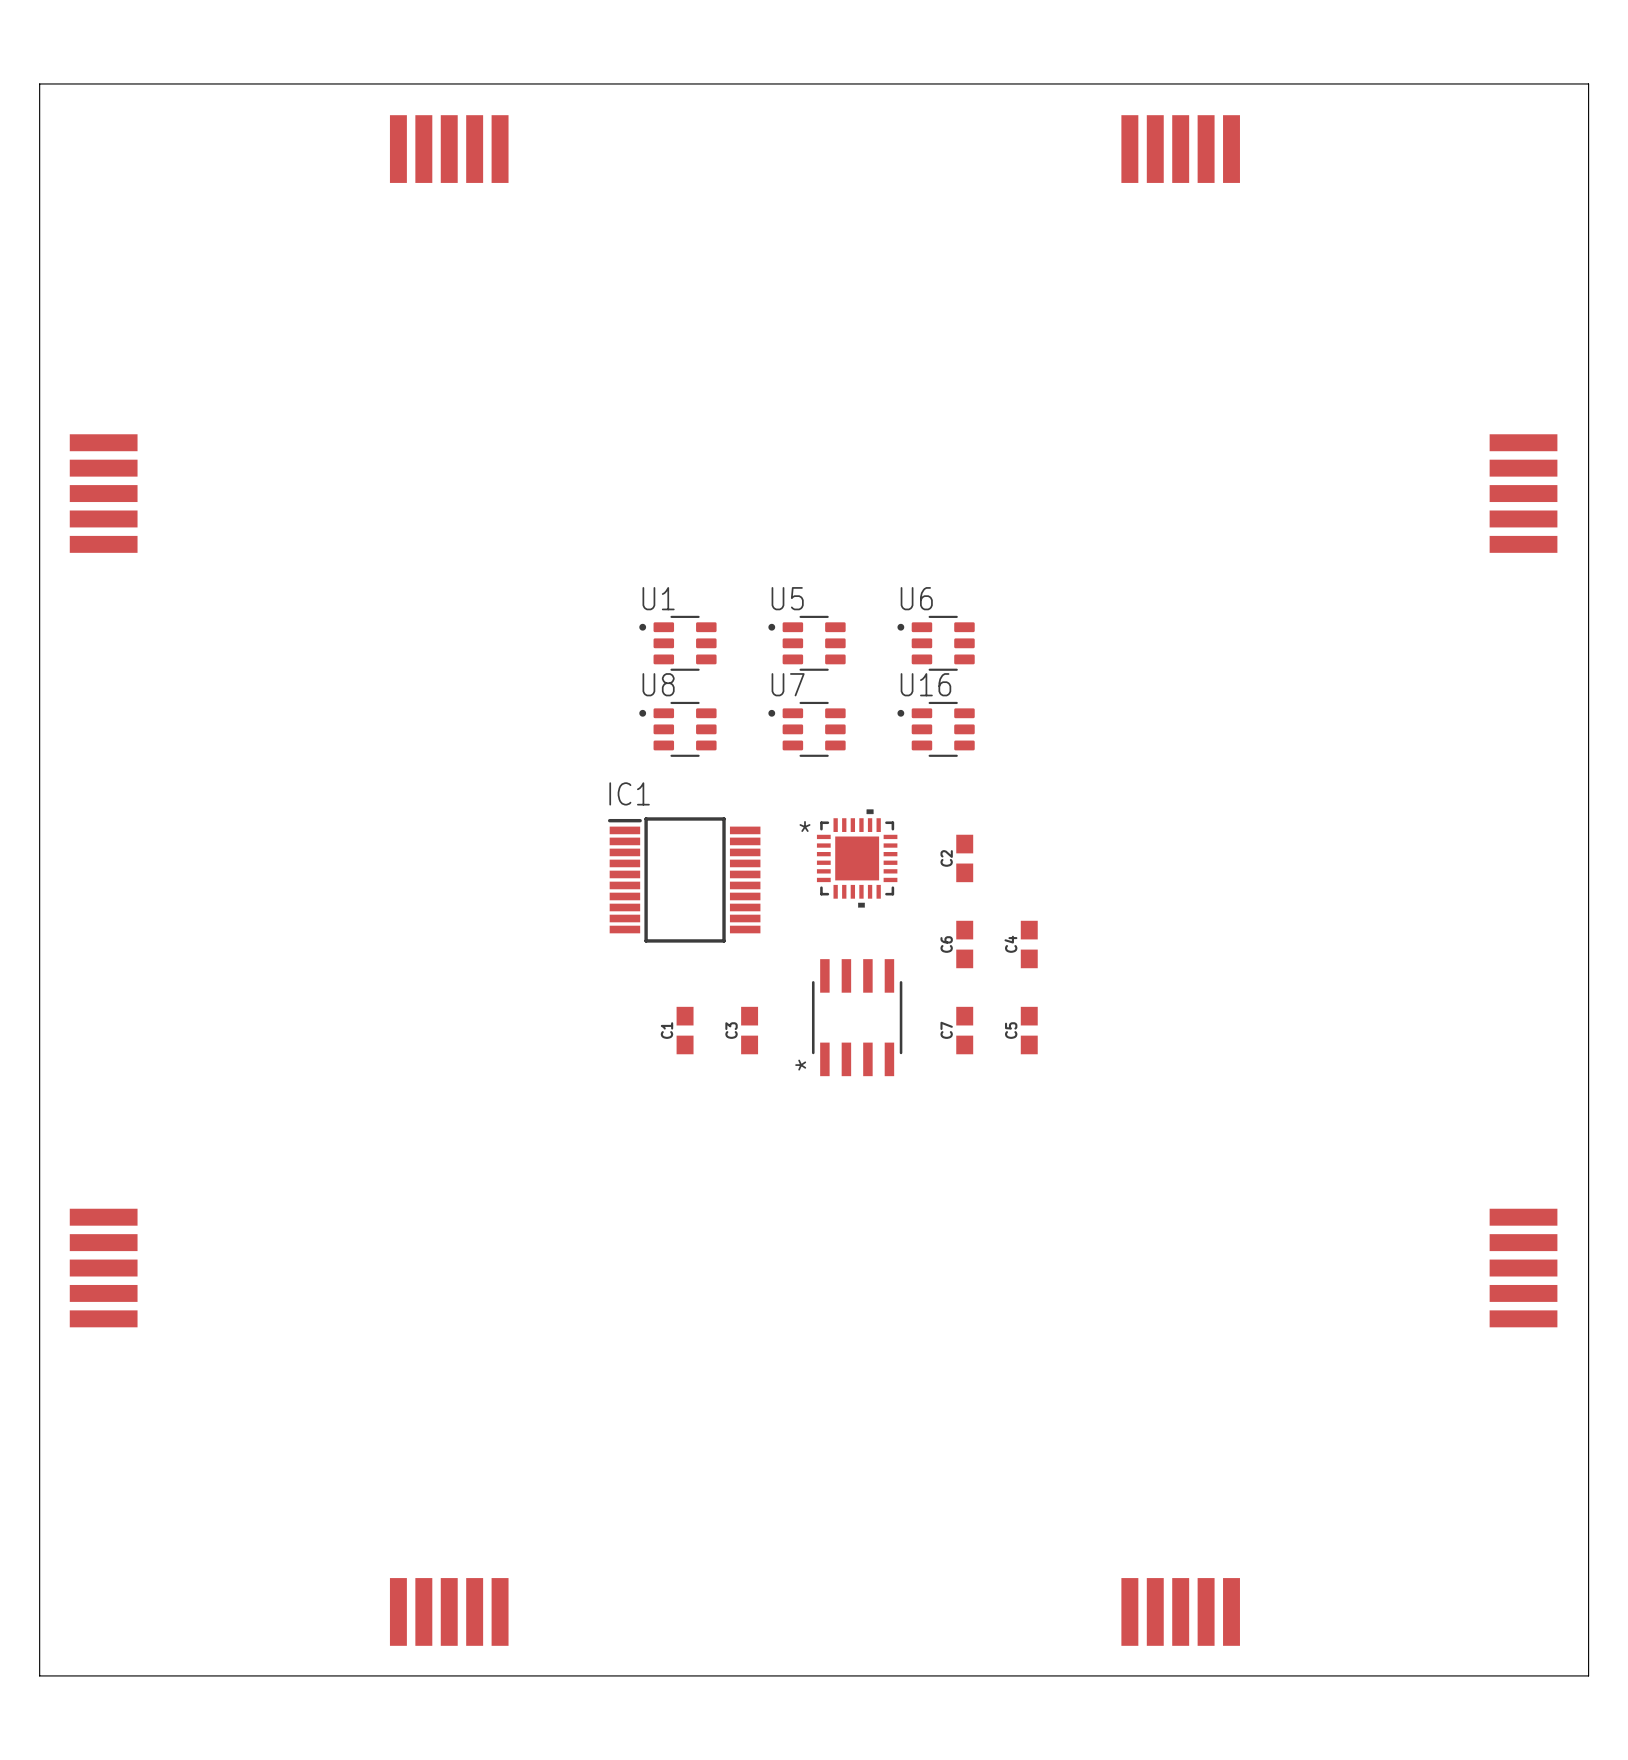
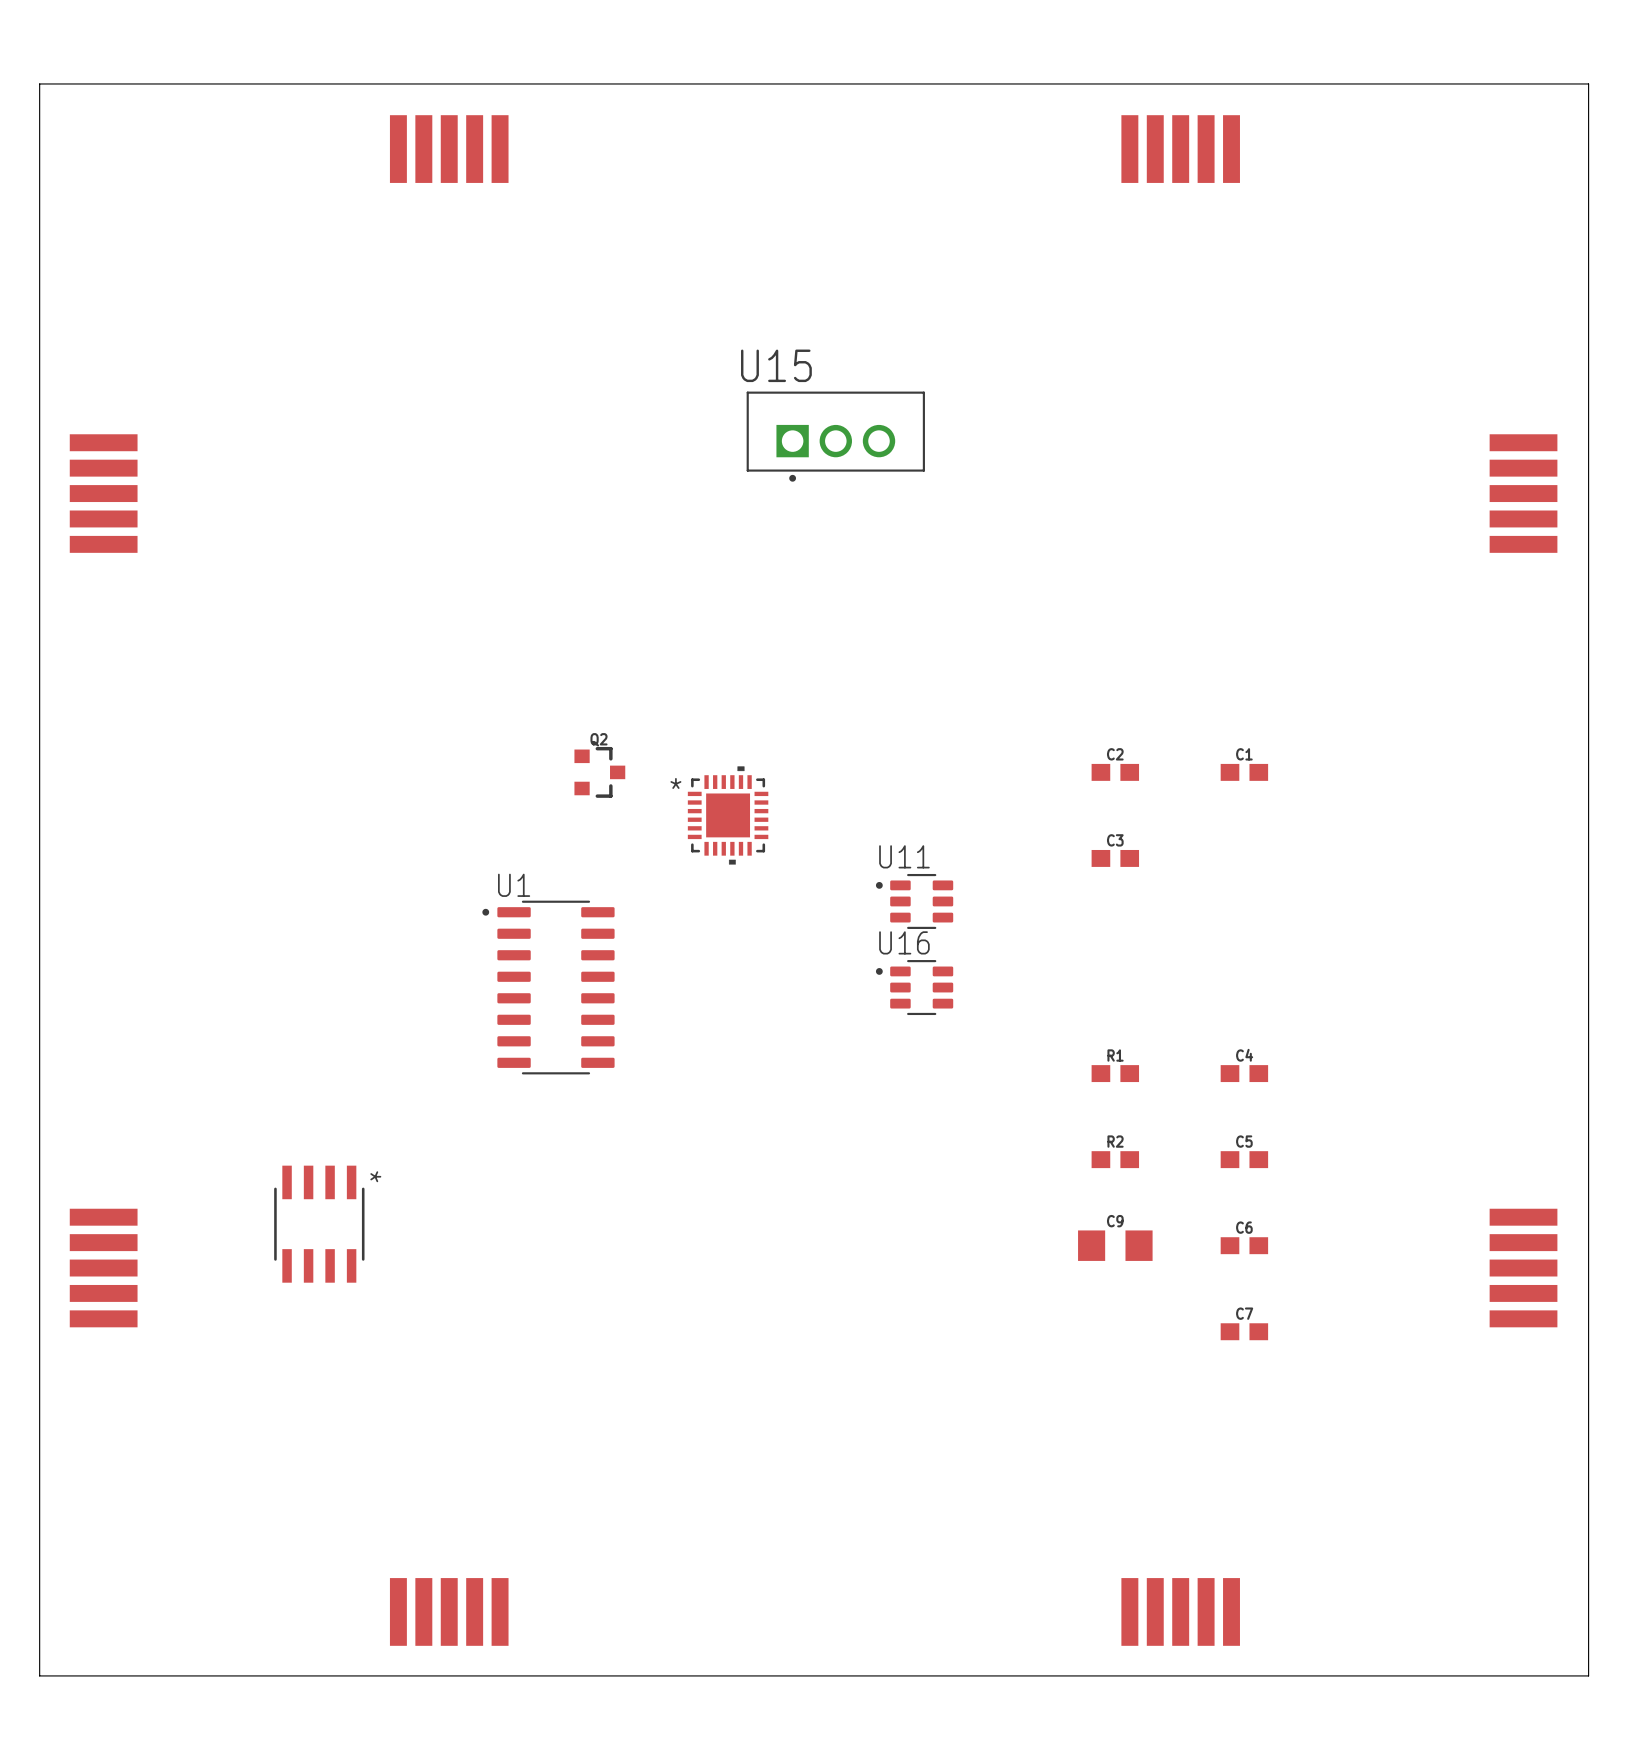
U15: none -> (835, 436)
U1 name position: U1 (658, 598) -> U1 (514, 885)
U1 footprint: [639, 615, 717, 671] -> [482, 900, 615, 1075]
U5: (807, 643) -> none
U6: (936, 643) -> none
U8: (677, 729) -> none
U7: (807, 729) -> none
U16 position: (936, 729) -> (914, 987)
Q2: none -> (599, 772)
part position: (857, 858) -> (728, 815)
C2 rotation: 0° (964, 858) -> 90° clockwise (1115, 772)
C2 position: (964, 858) -> (1115, 772)
IC1: (684, 879) -> none
U11: none -> (914, 901)
C6 rotation: 0° (964, 944) -> 90° clockwise (1244, 1245)
C6 position: (964, 944) -> (1244, 1245)
C4 rotation: 0° (1029, 944) -> 90° clockwise (1244, 1073)
C4 position: (1029, 944) -> (1244, 1073)
part: (857, 1017) -> none
C1 rotation: 0° (685, 1030) -> 90° clockwise (1244, 772)
C1 position: (685, 1030) -> (1244, 772)
C3 rotation: 0° (749, 1030) -> 90° clockwise (1115, 858)
C3 position: (749, 1030) -> (1115, 858)
C7 rotation: 0° (964, 1030) -> 90° clockwise (1244, 1331)
C7 position: (964, 1030) -> (1244, 1331)
C5 rotation: 0° (1029, 1030) -> 90° clockwise (1244, 1159)
C5 position: (1029, 1030) -> (1244, 1159)
R1: none -> (1115, 1073)
R2: none -> (1115, 1159)
part: none -> (319, 1224)
C9: none -> (1115, 1245)

